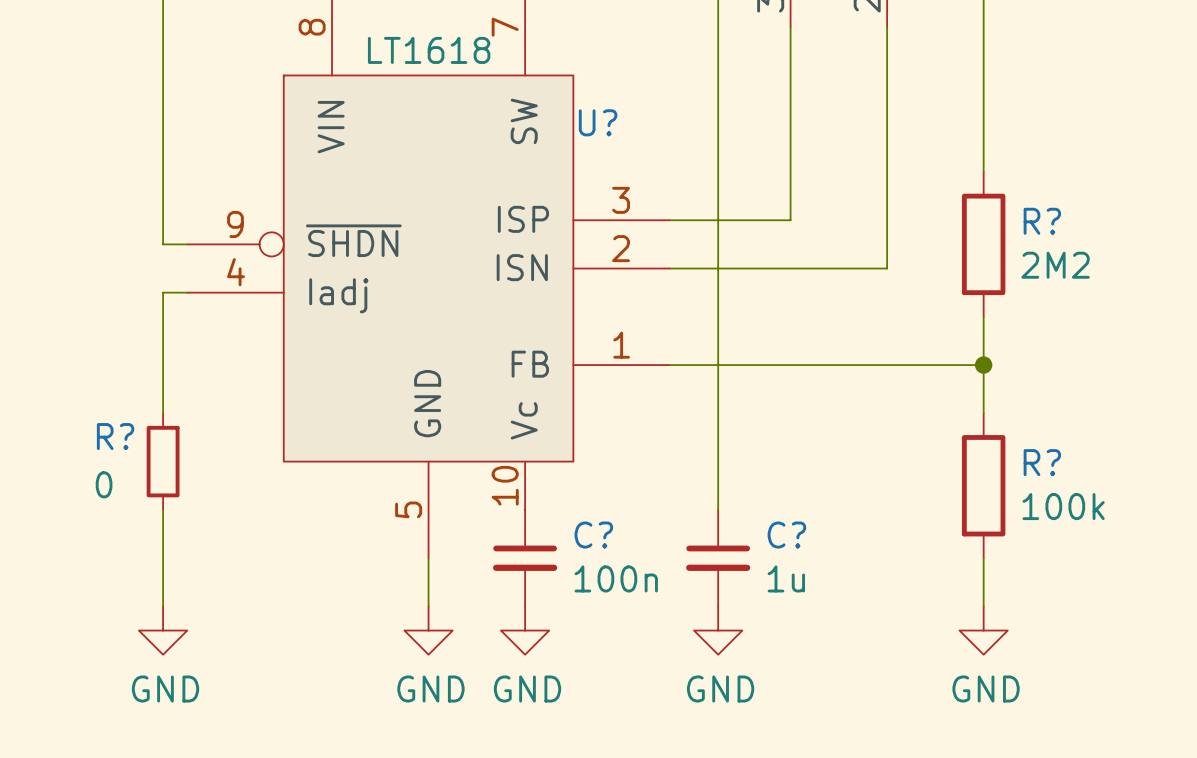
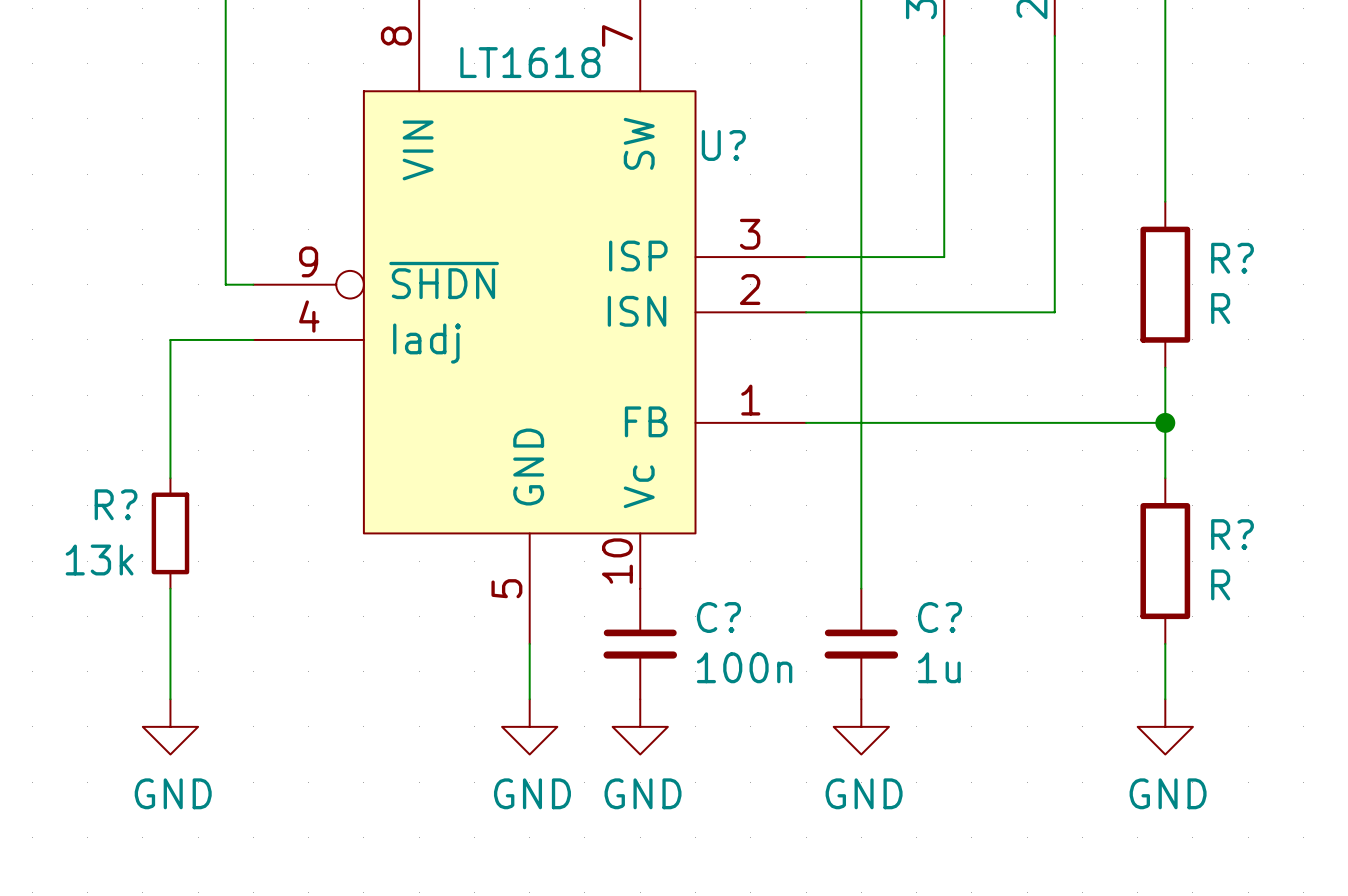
R? value: 2M2 (1055, 265) -> R (1220, 308)
wire: (163, 292) (163, 413) -> (225, 339) (170, 339) (170, 478)
R?: none -> 13k (170, 533)
R?: 0 (163, 461) -> none
R? value: 100k (1063, 506) -> R (1220, 584)
wire: (163, 509) (163, 606) -> (170, 588) (170, 699)
power symbol position: GND (163, 630) -> GND (170, 726)

